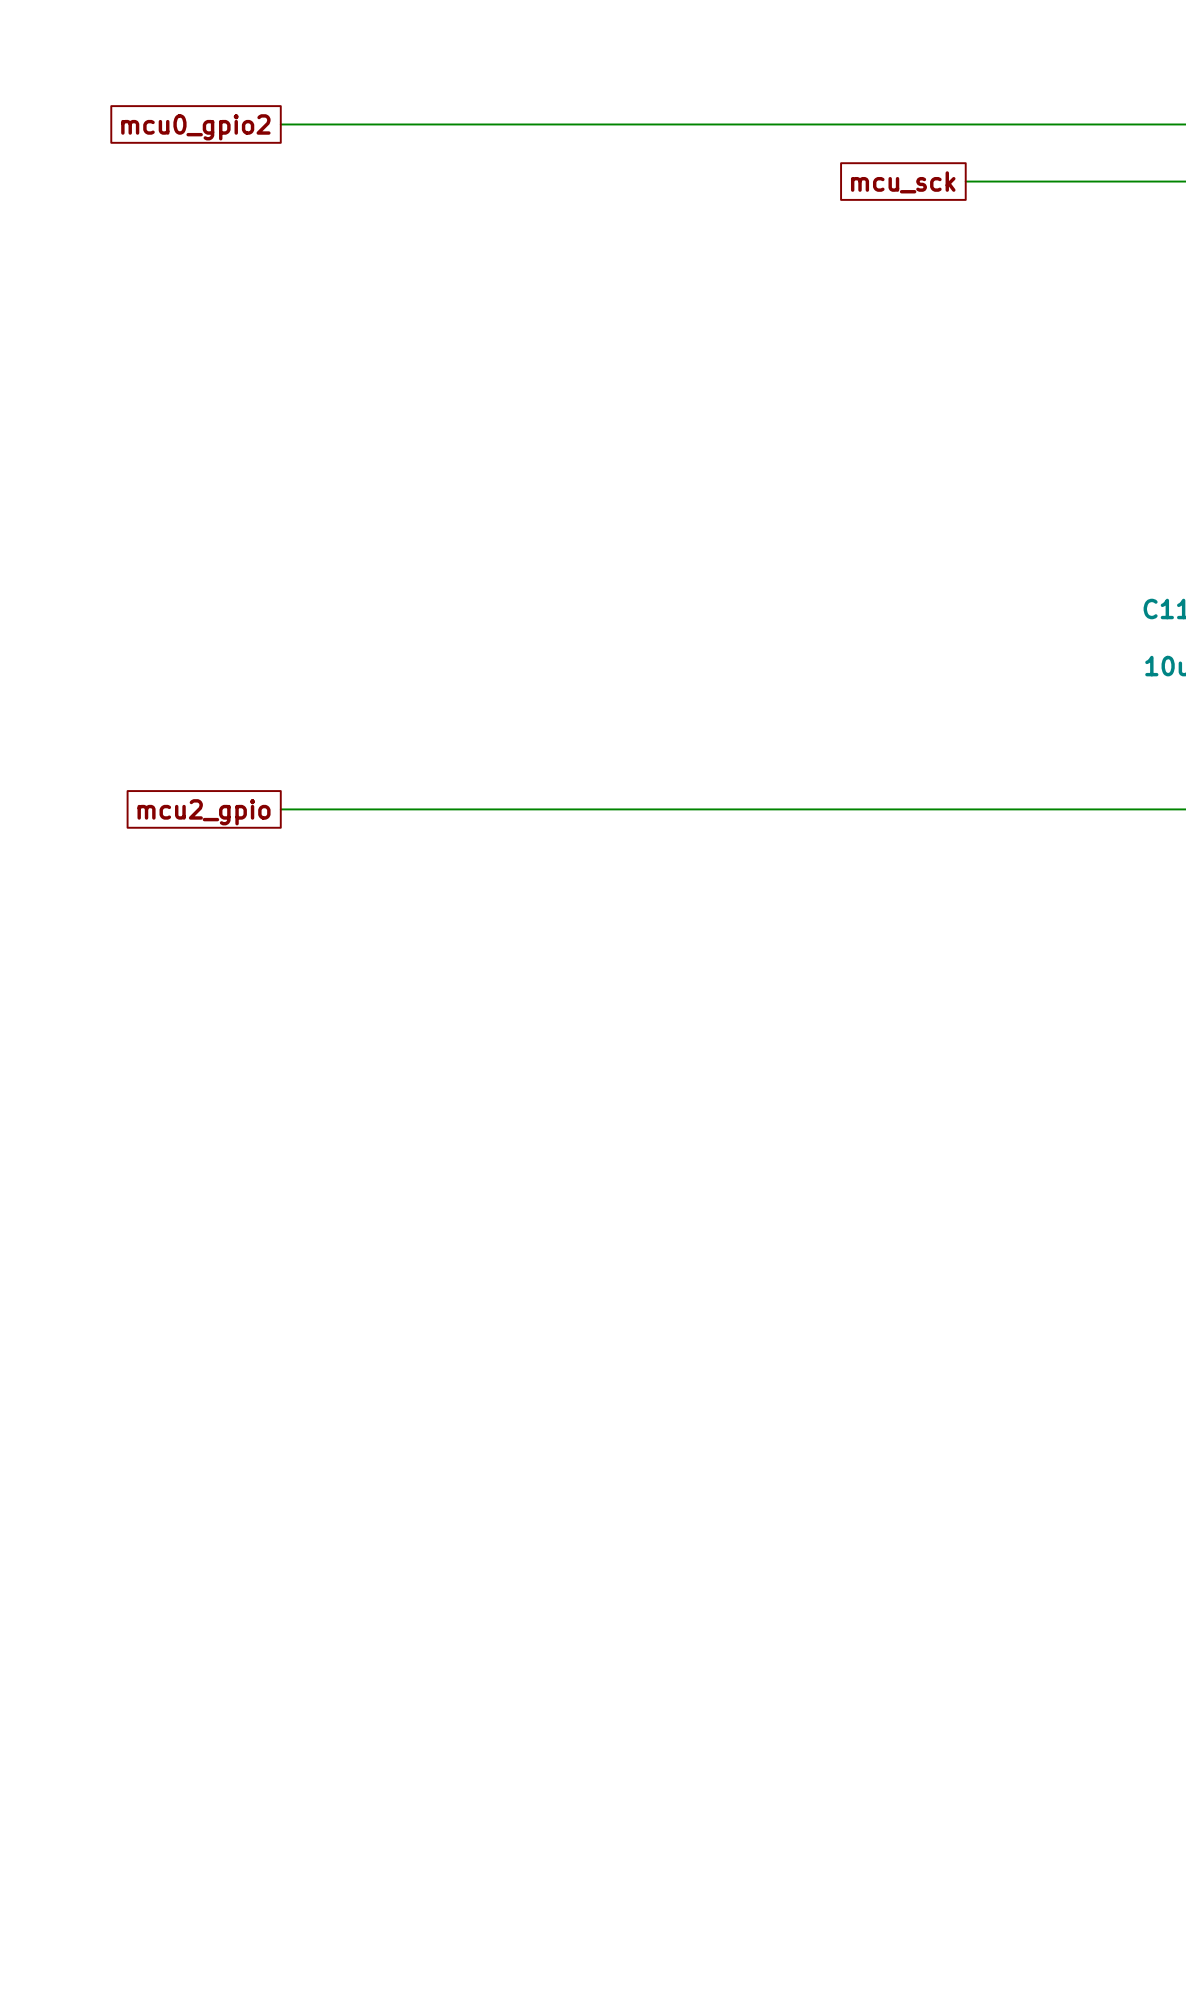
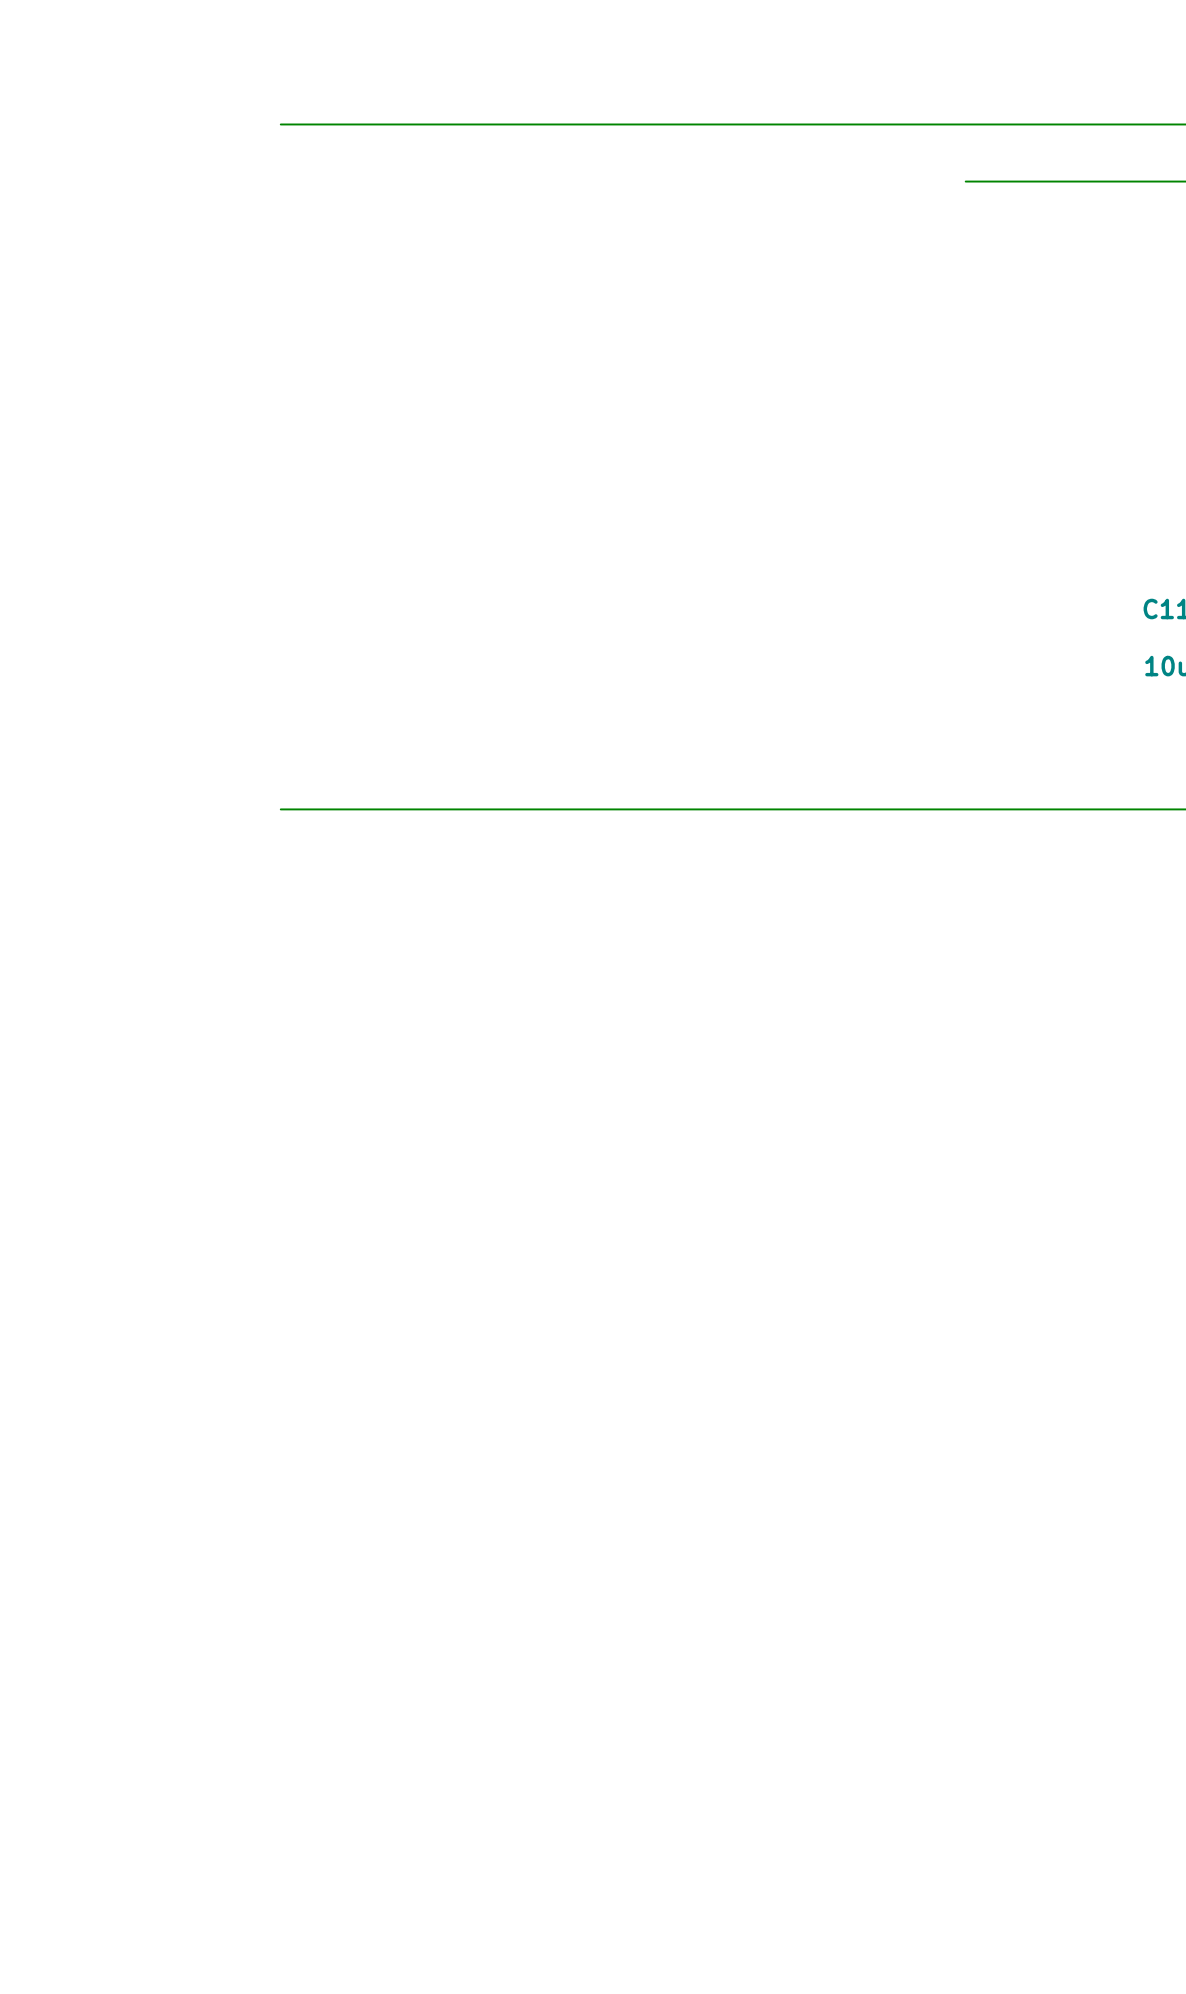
global label: mcu0_gpio2 (195, 127) -> none
global label: mcu_sck (903, 182) -> none
global label: mcu2_gpio (204, 812) -> none

